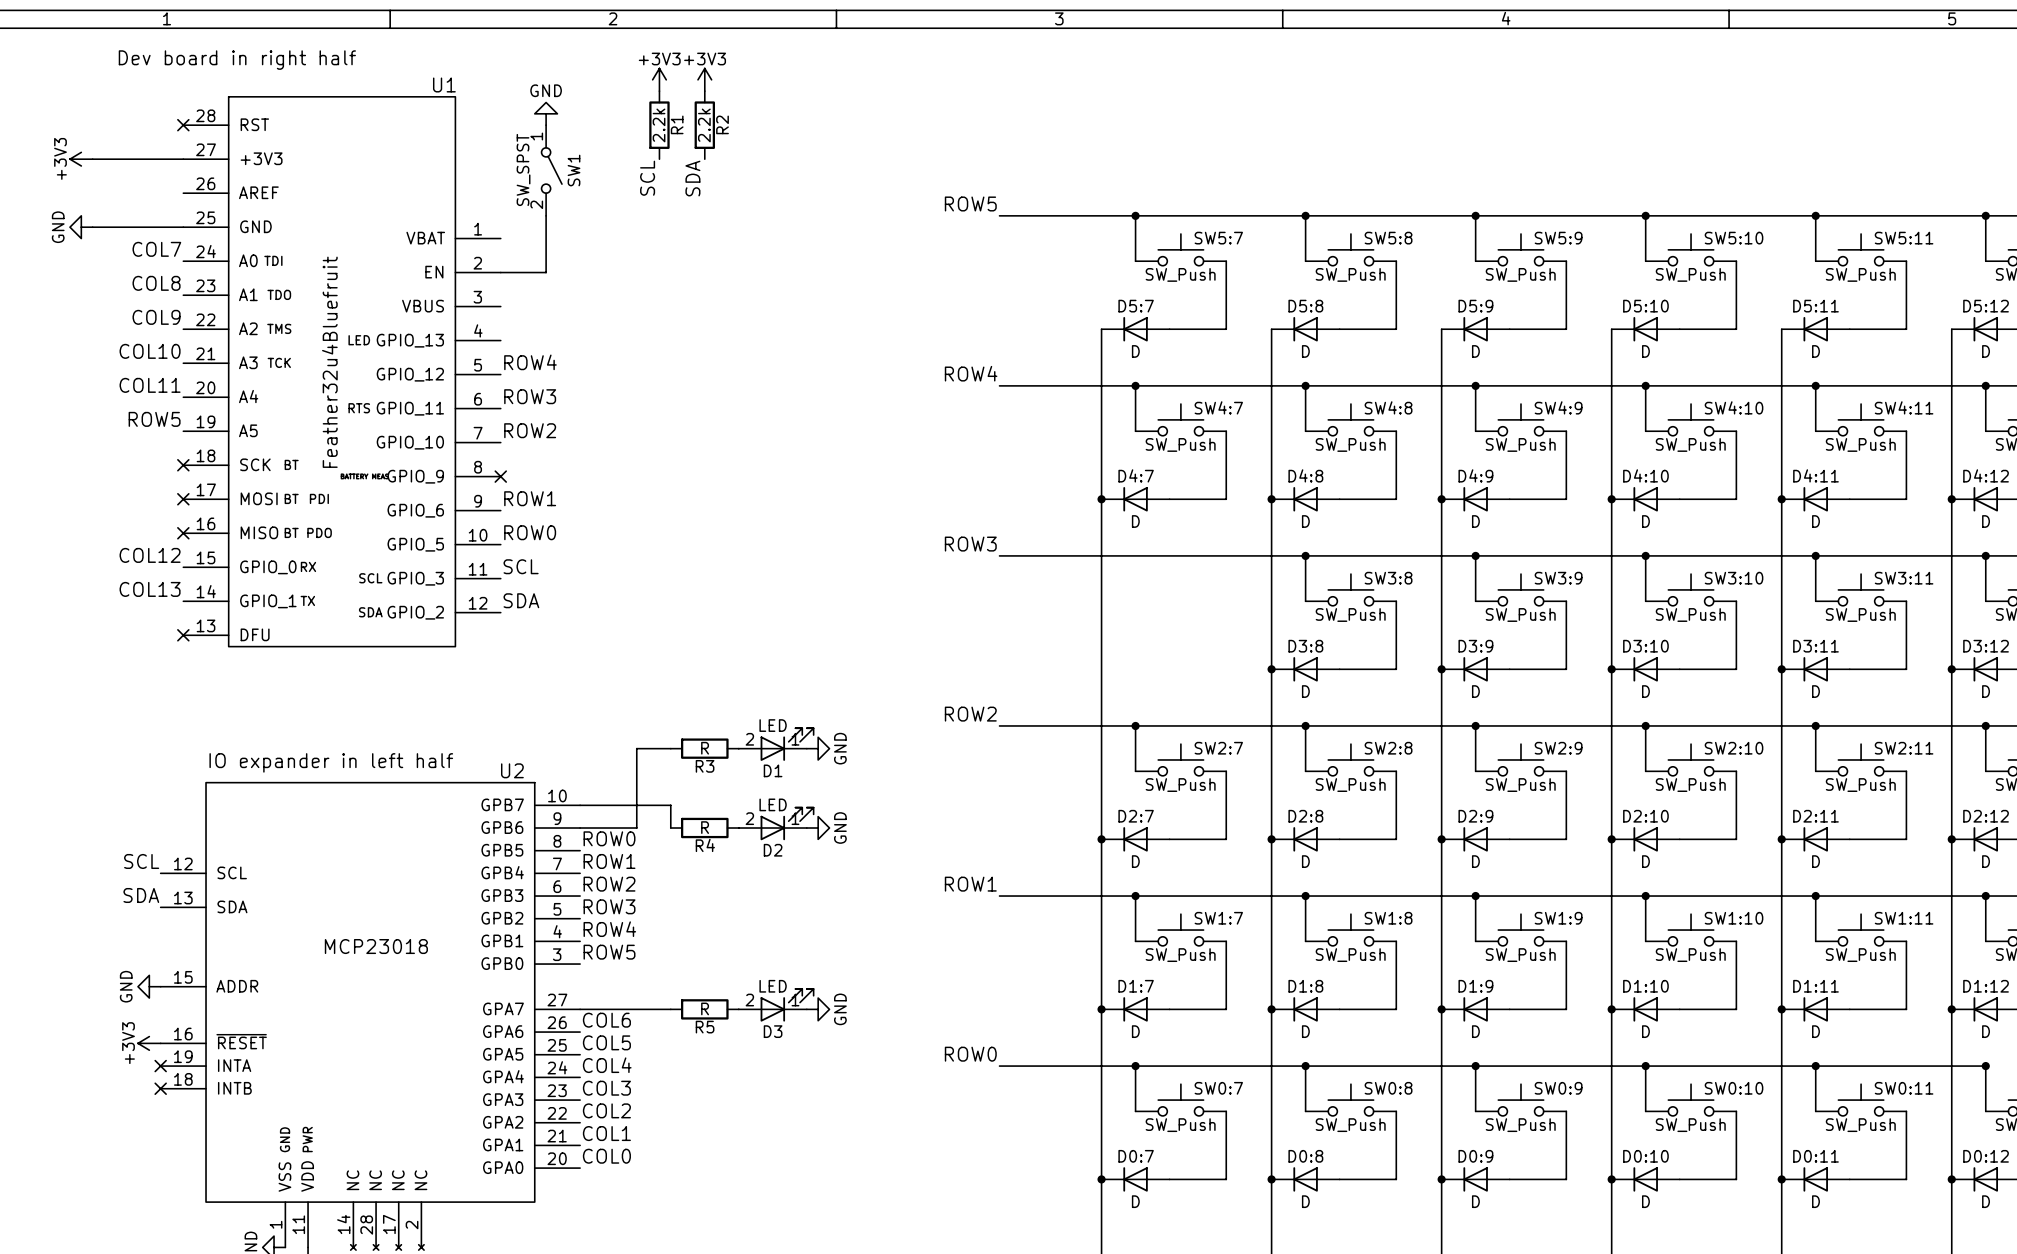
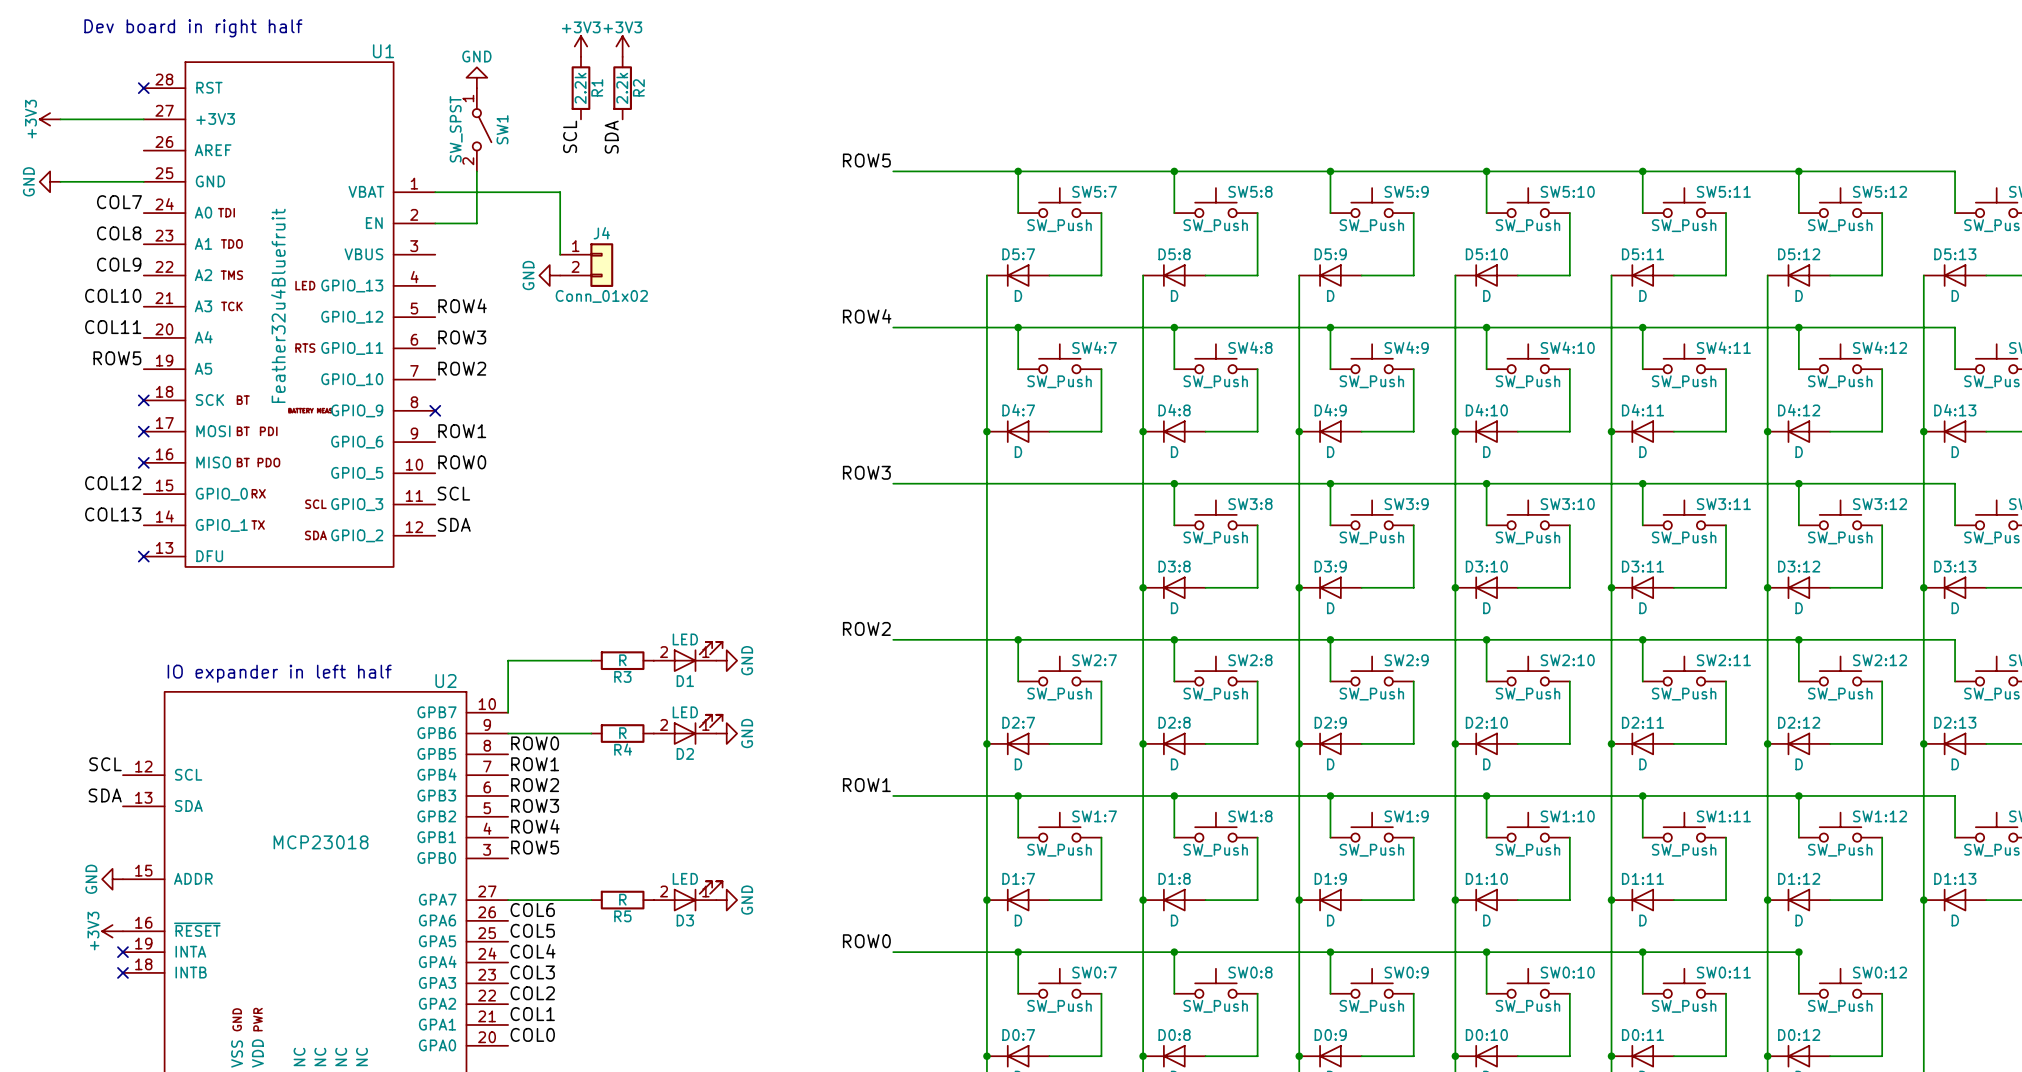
wire: none -> (435, 192) (560, 192) (560, 254)
J4: none -> Conn_01x02 (586, 265)
power symbol: none -> GND (549, 275)
wire: (636, 748) (636, 828) -> (560, 660) (508, 660) (508, 712)
wire: (580, 805) (670, 805) (670, 828) -> (560, 733) (591, 733)

